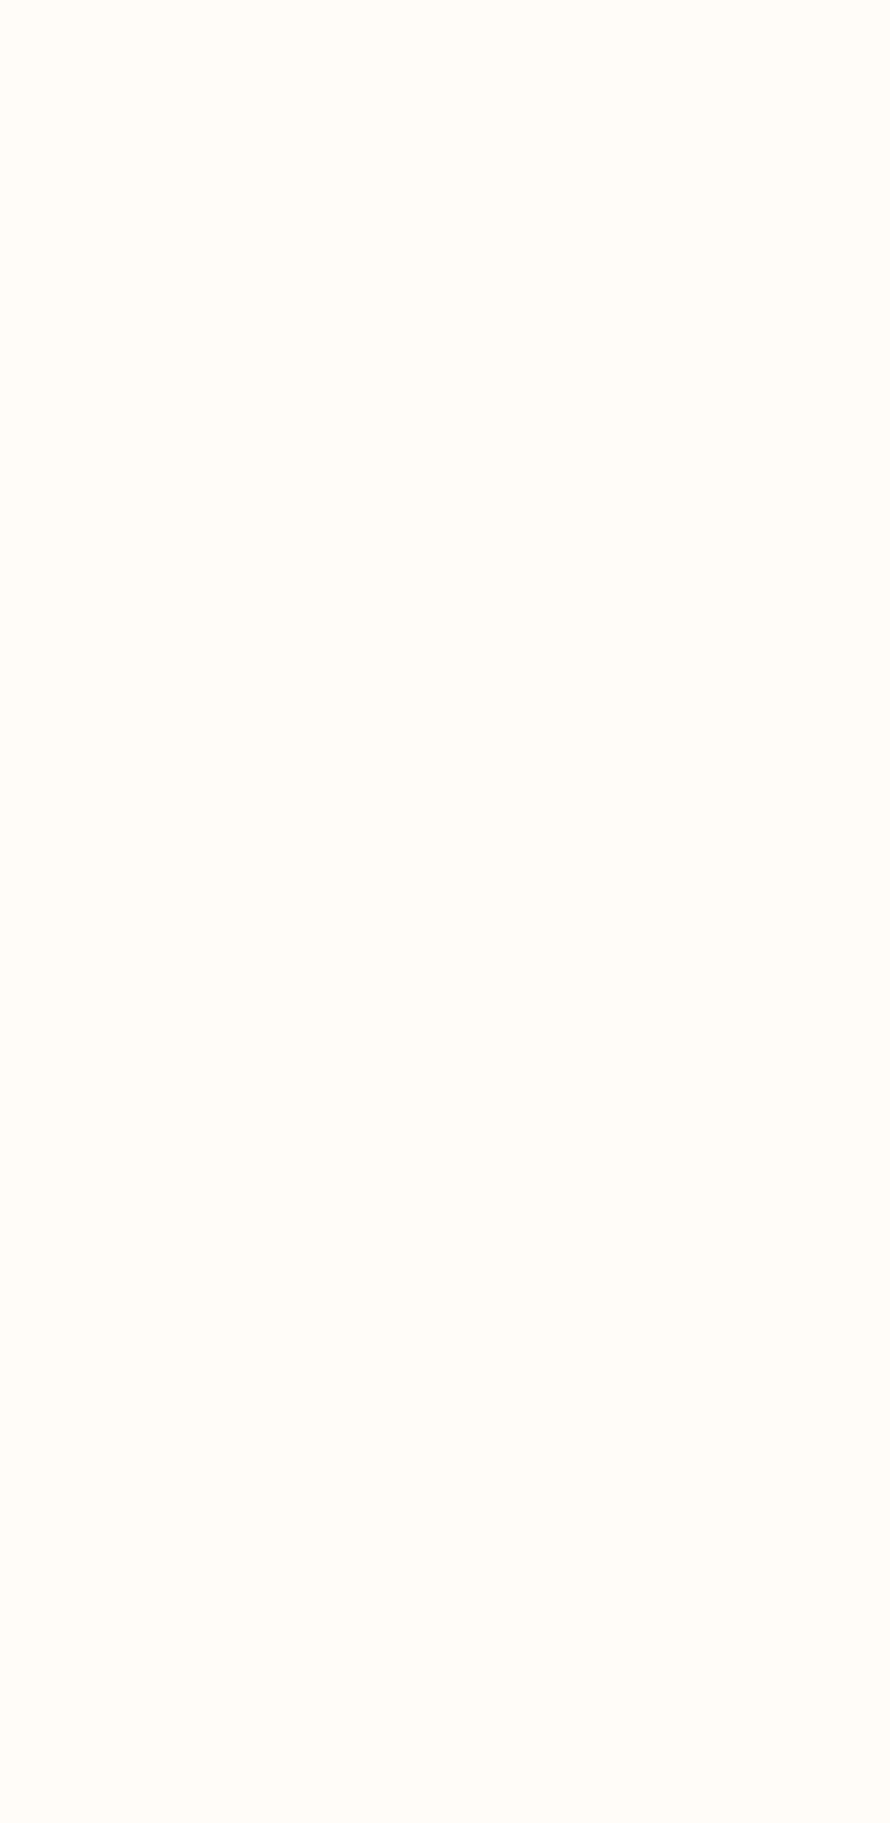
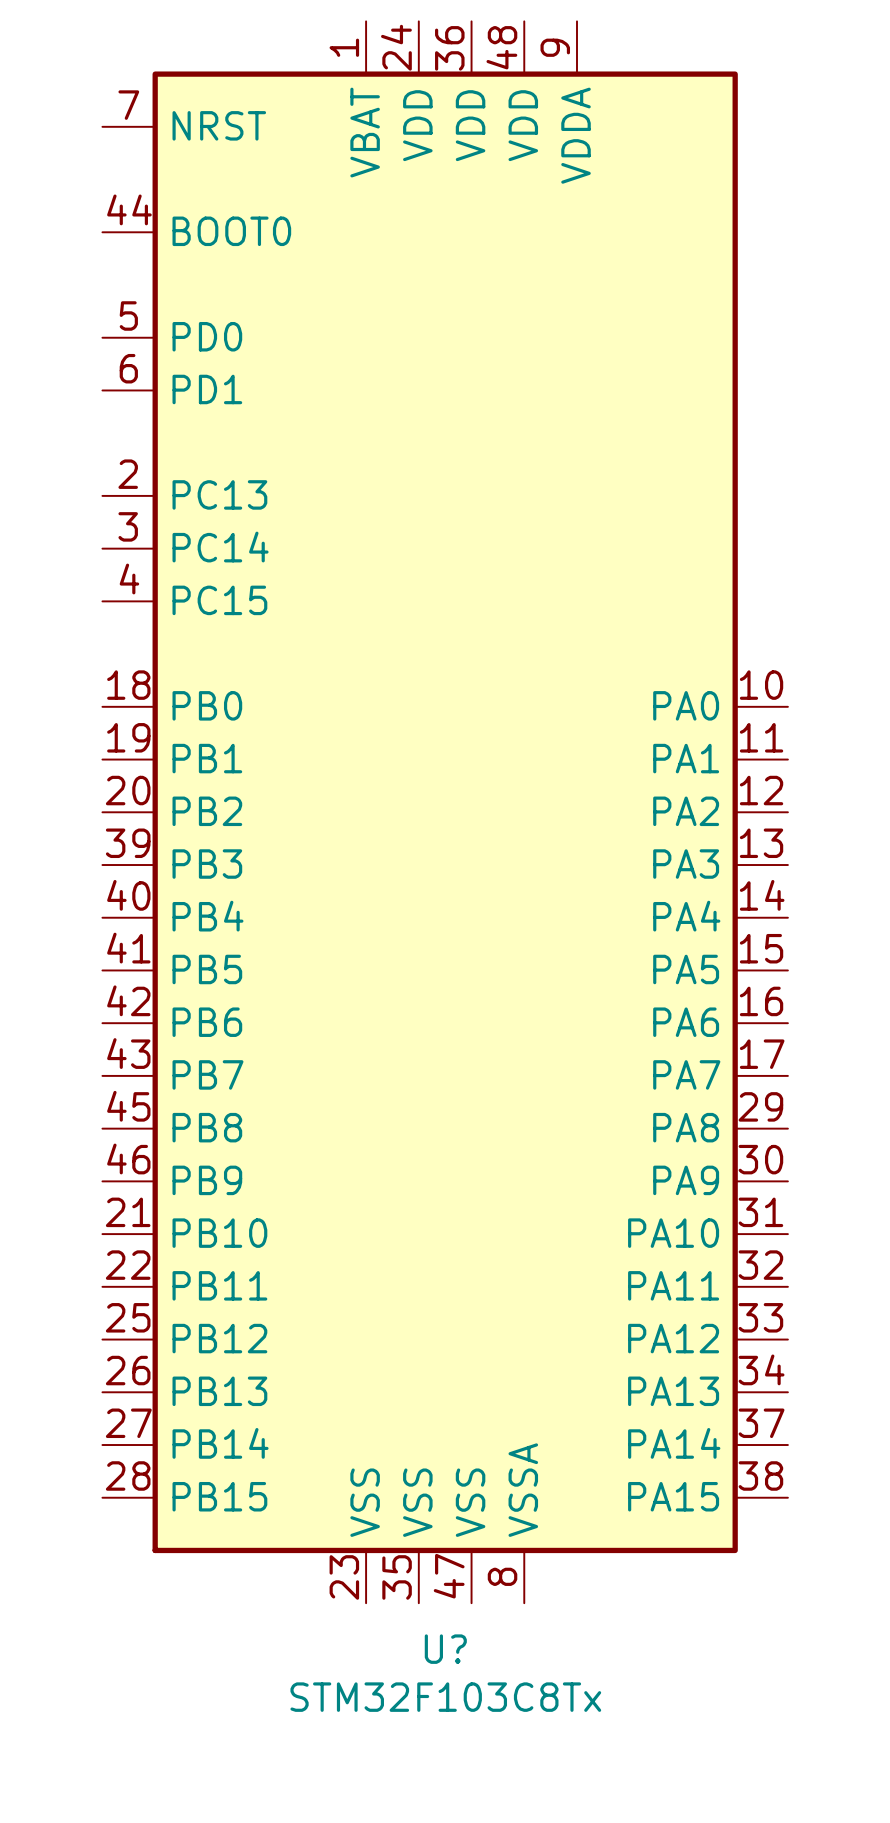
U?: none -> STM32F103C8Tx (445, 812)

